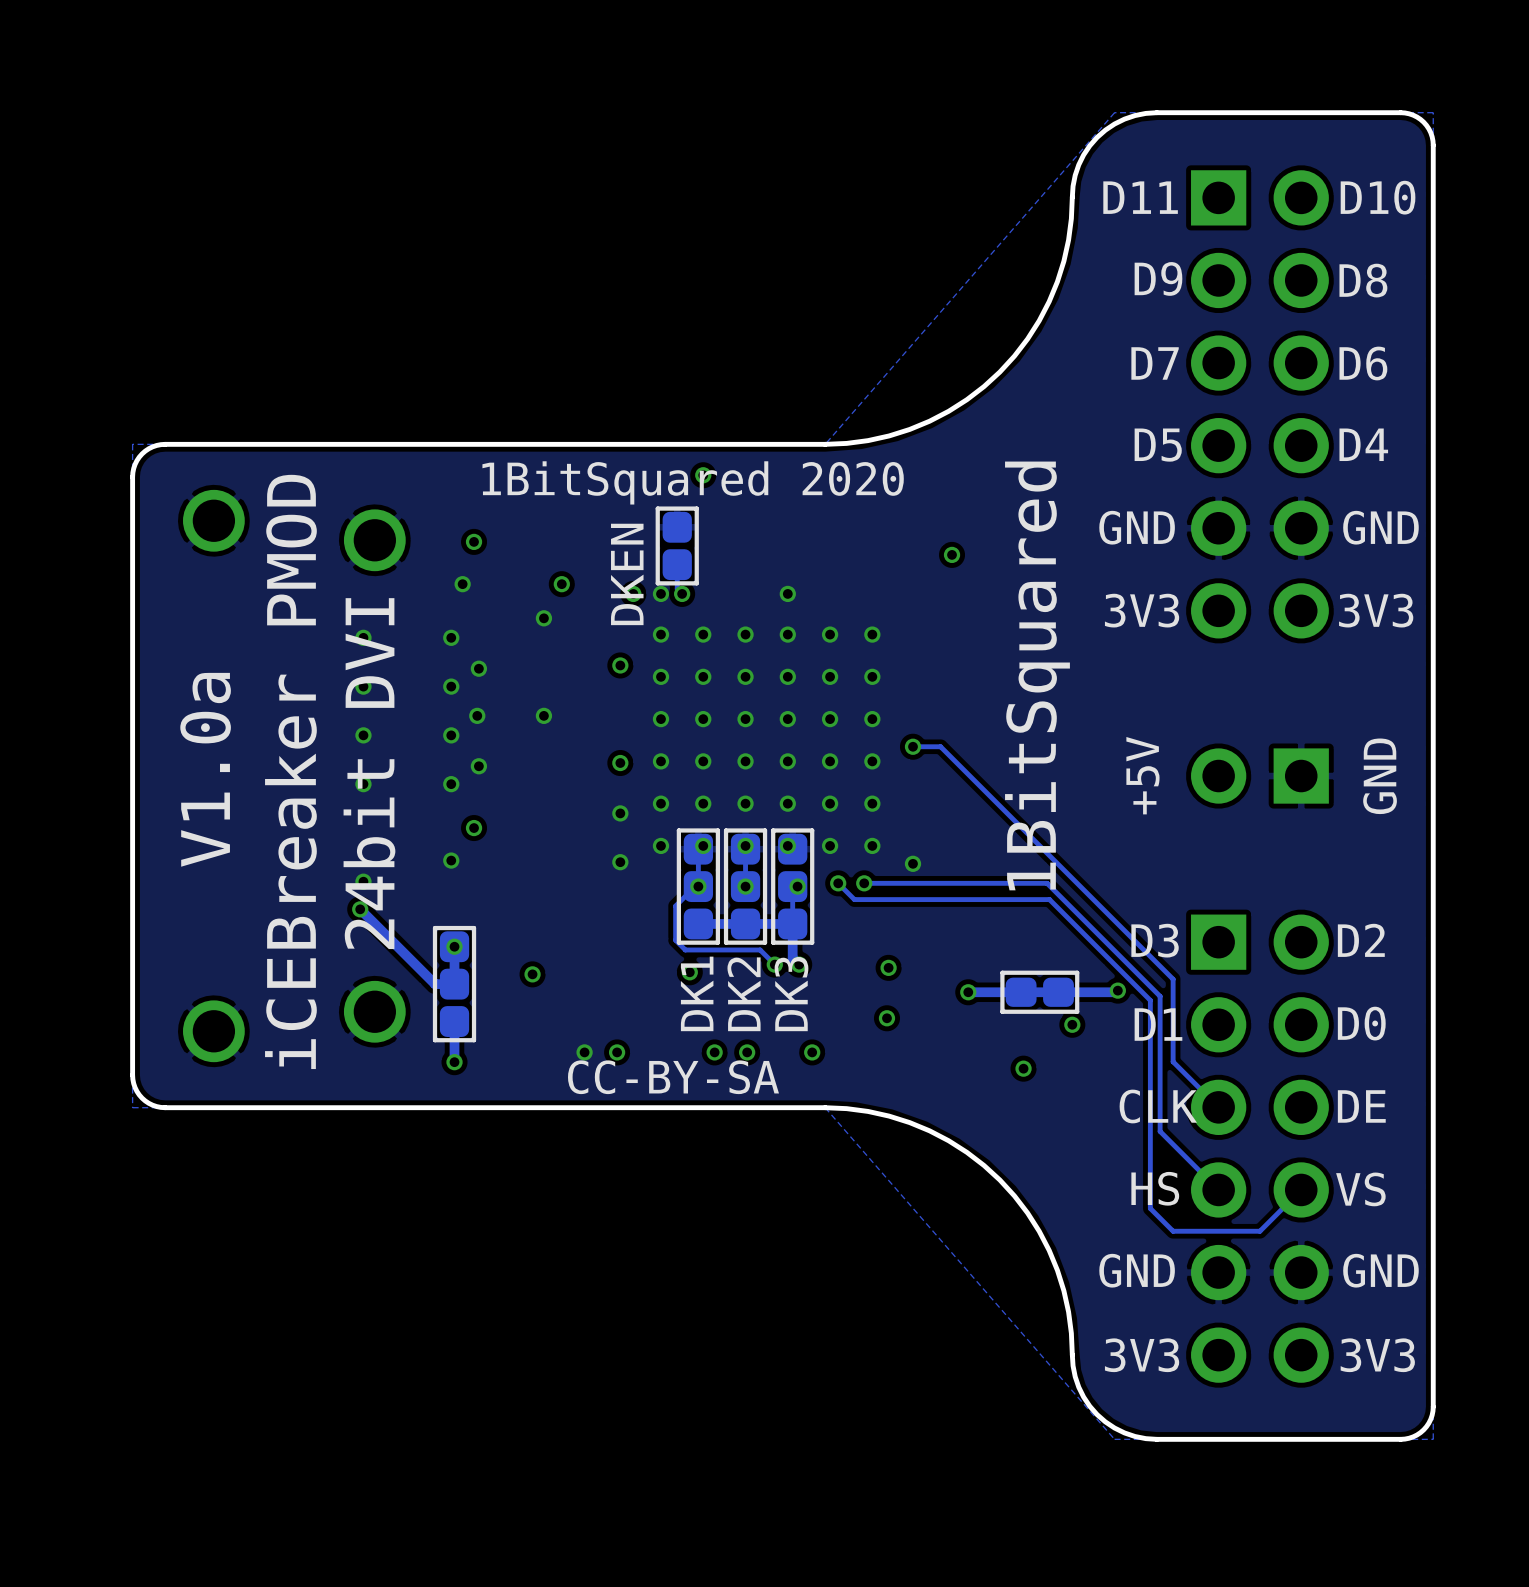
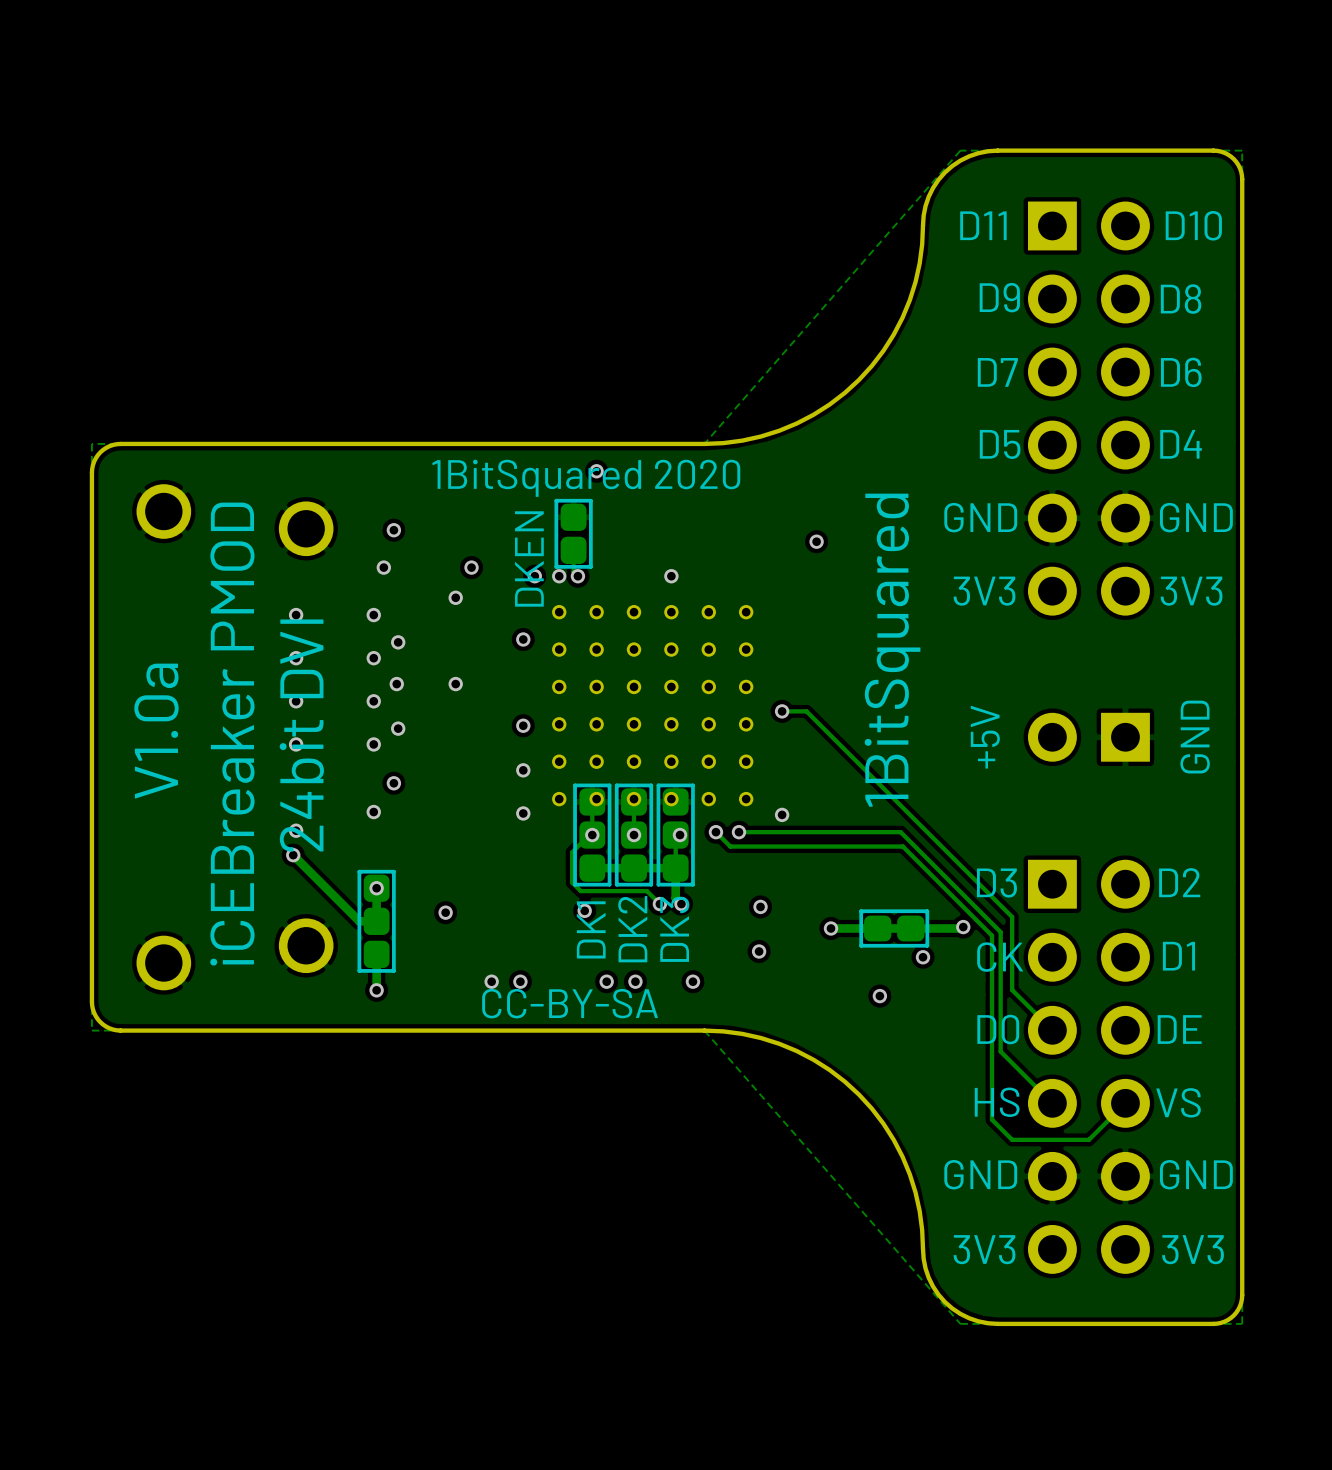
text: D0 (1361, 1023) -> D1 (1178, 956)
text: D1 (1158, 1024) -> CK (1000, 957)
text: CLK (1158, 1106) -> D0 (998, 1029)

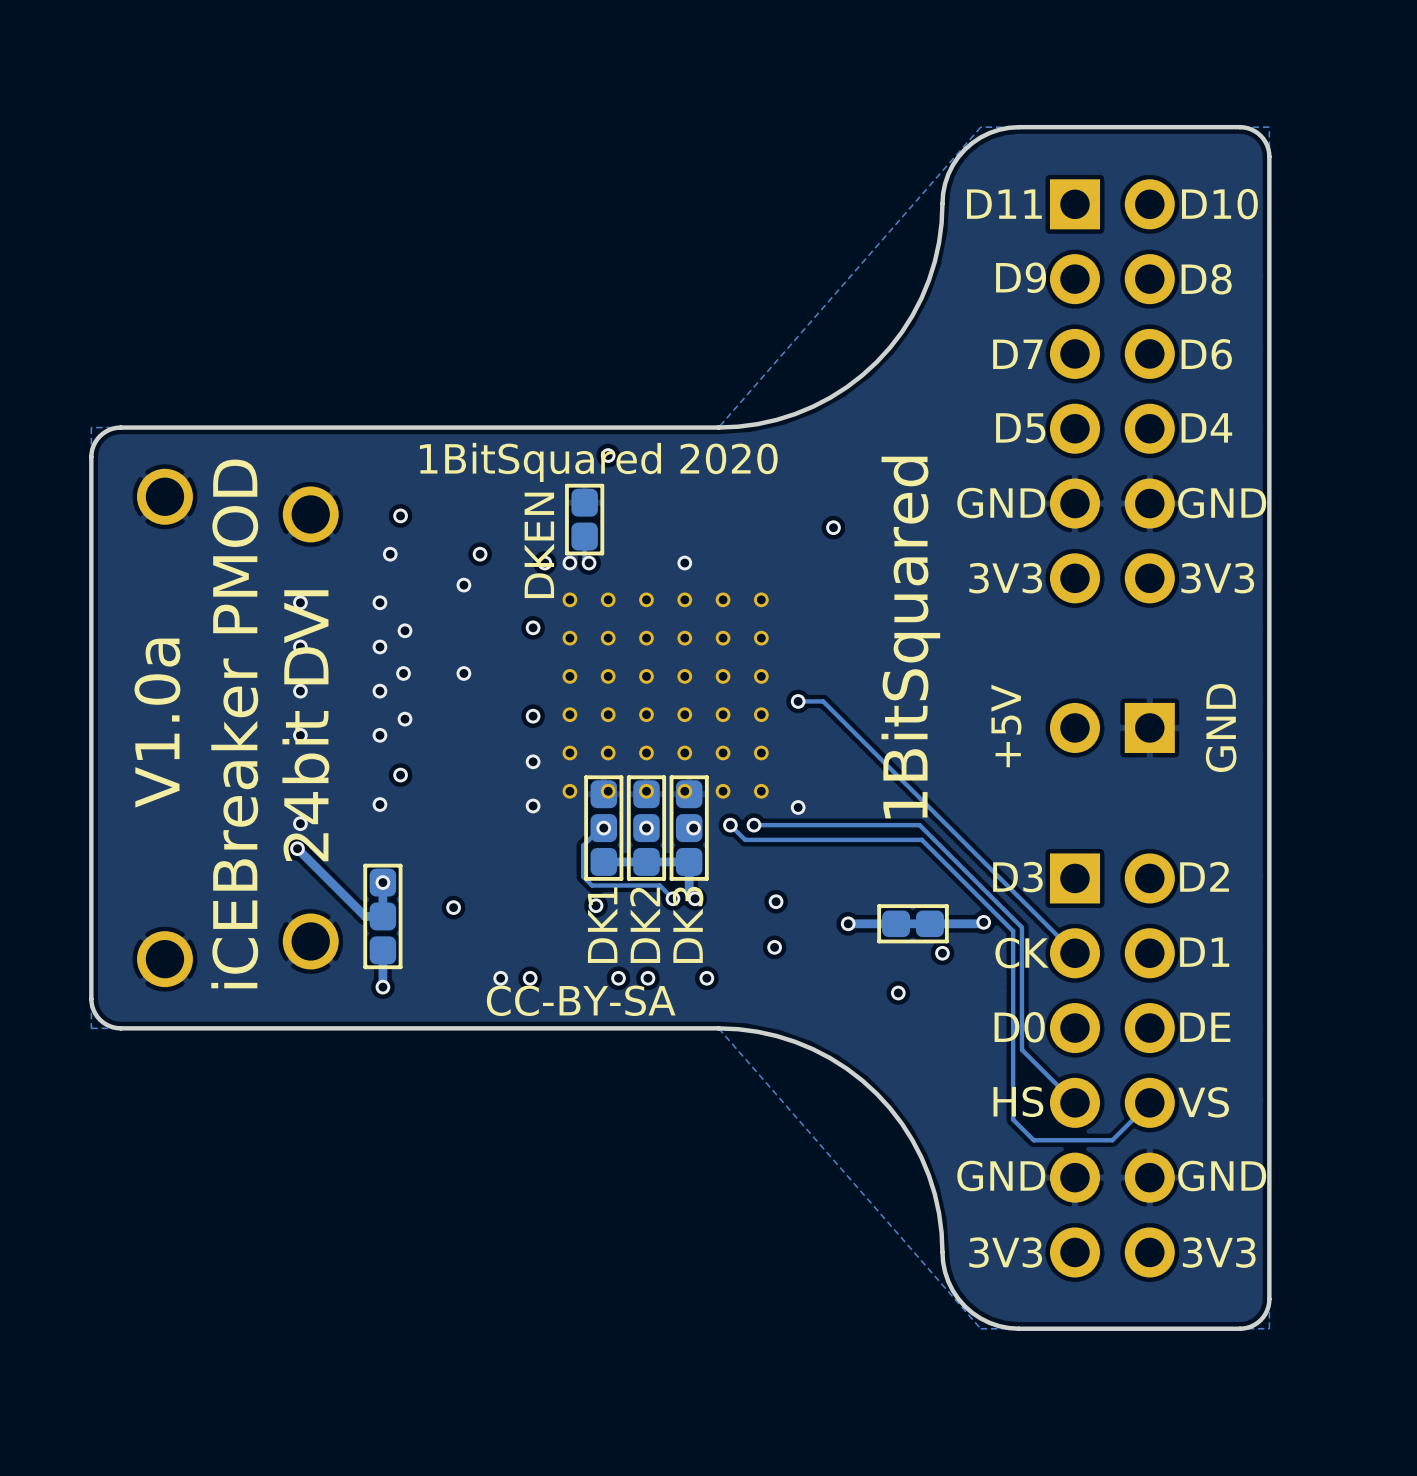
part footprint: [573, 783, 612, 887] -> [584, 775, 624, 881]
part footprint: [614, 783, 654, 887] -> [626, 775, 667, 881]
part footprint: [656, 783, 695, 887] -> [669, 775, 709, 881]
track: (1012, 916) (1012, 990) (1052, 1030) -> (1033, 912) (1074, 953)

